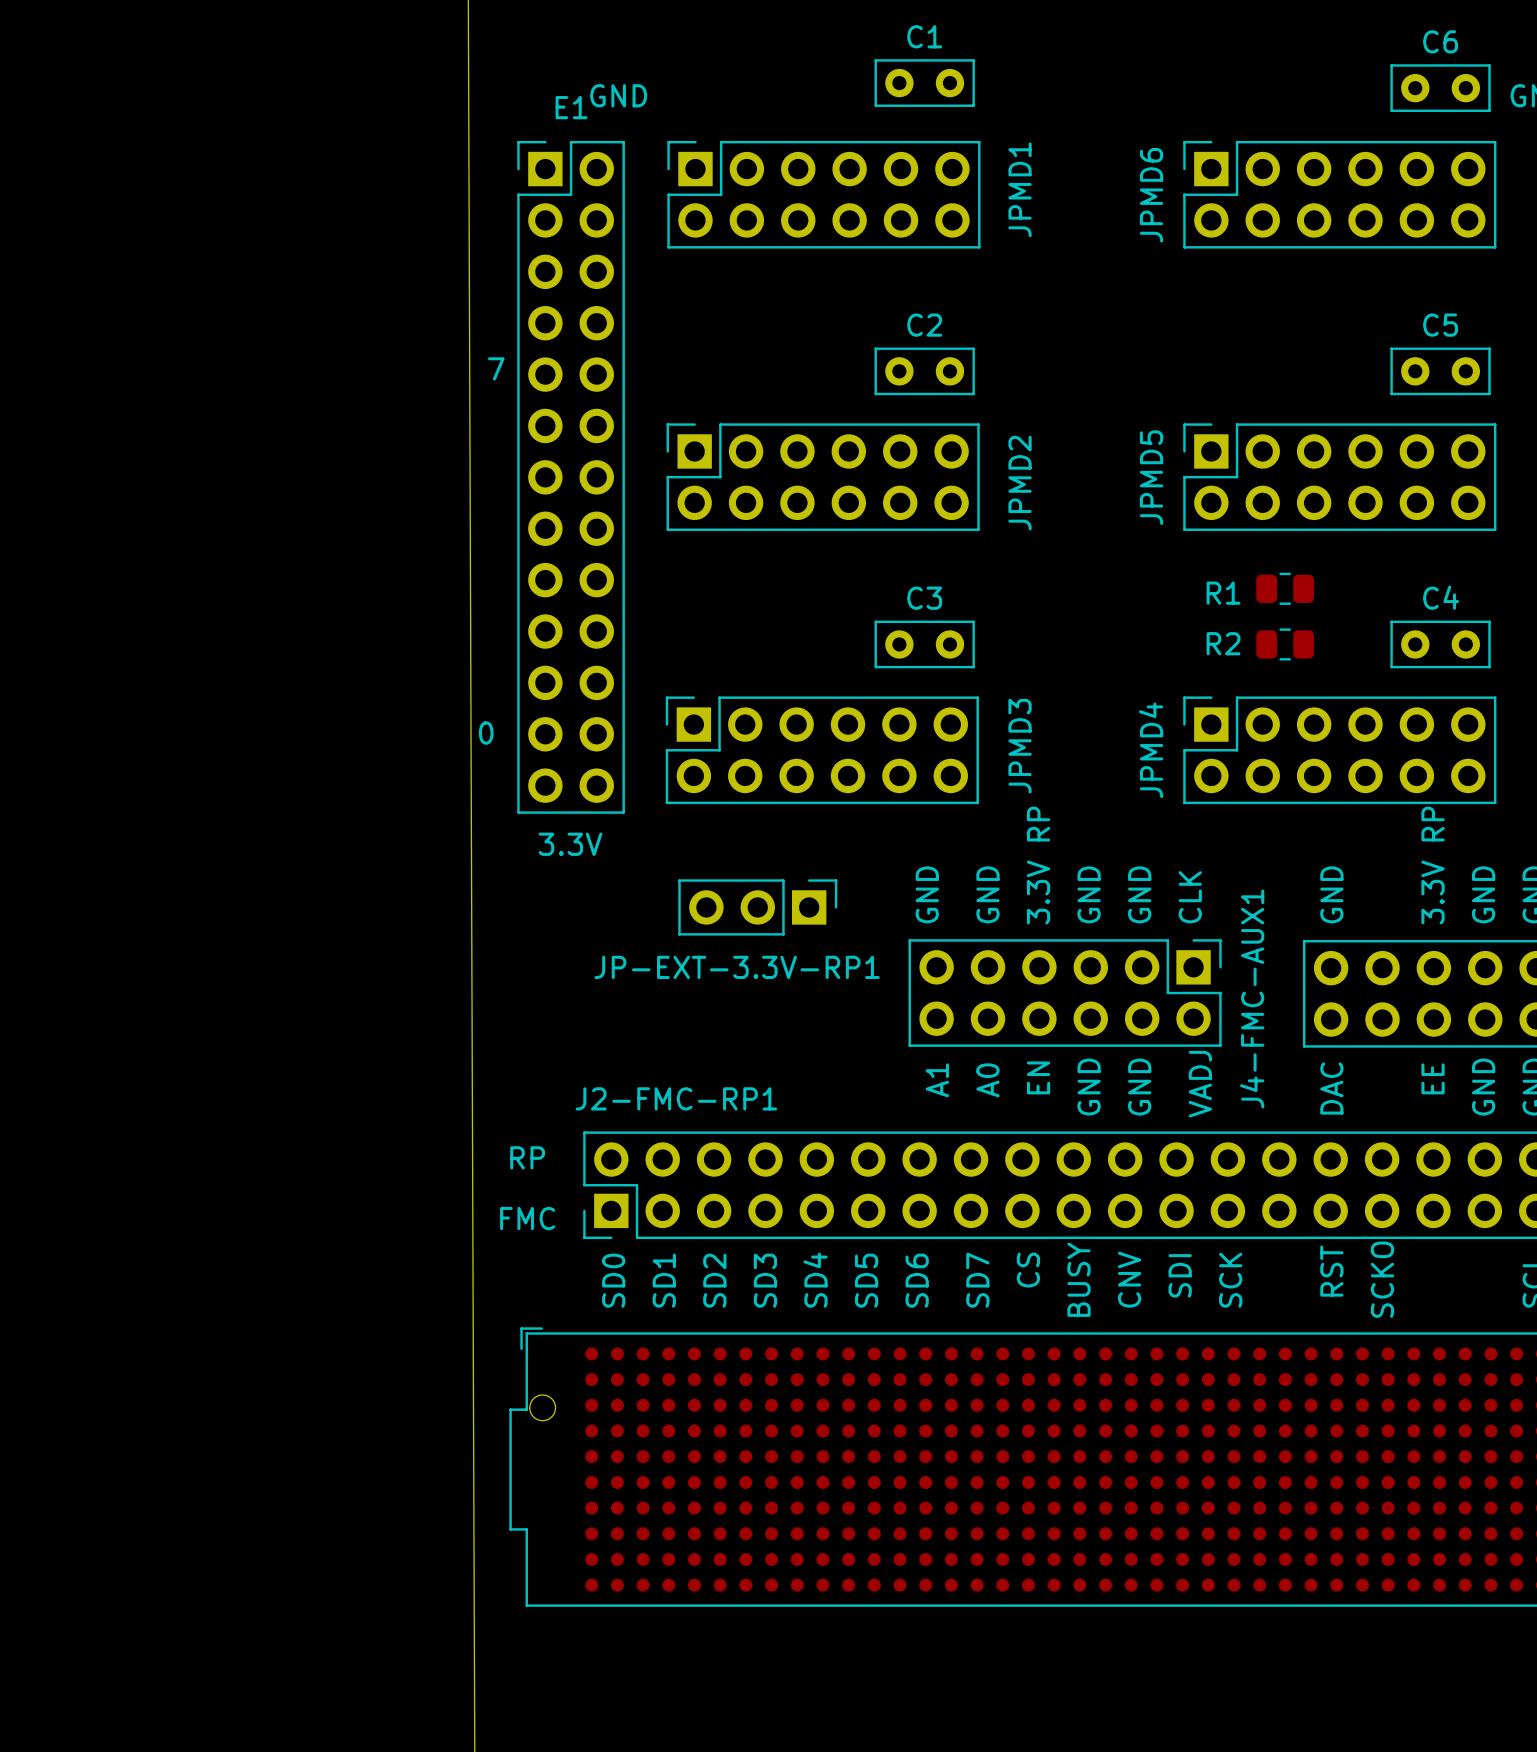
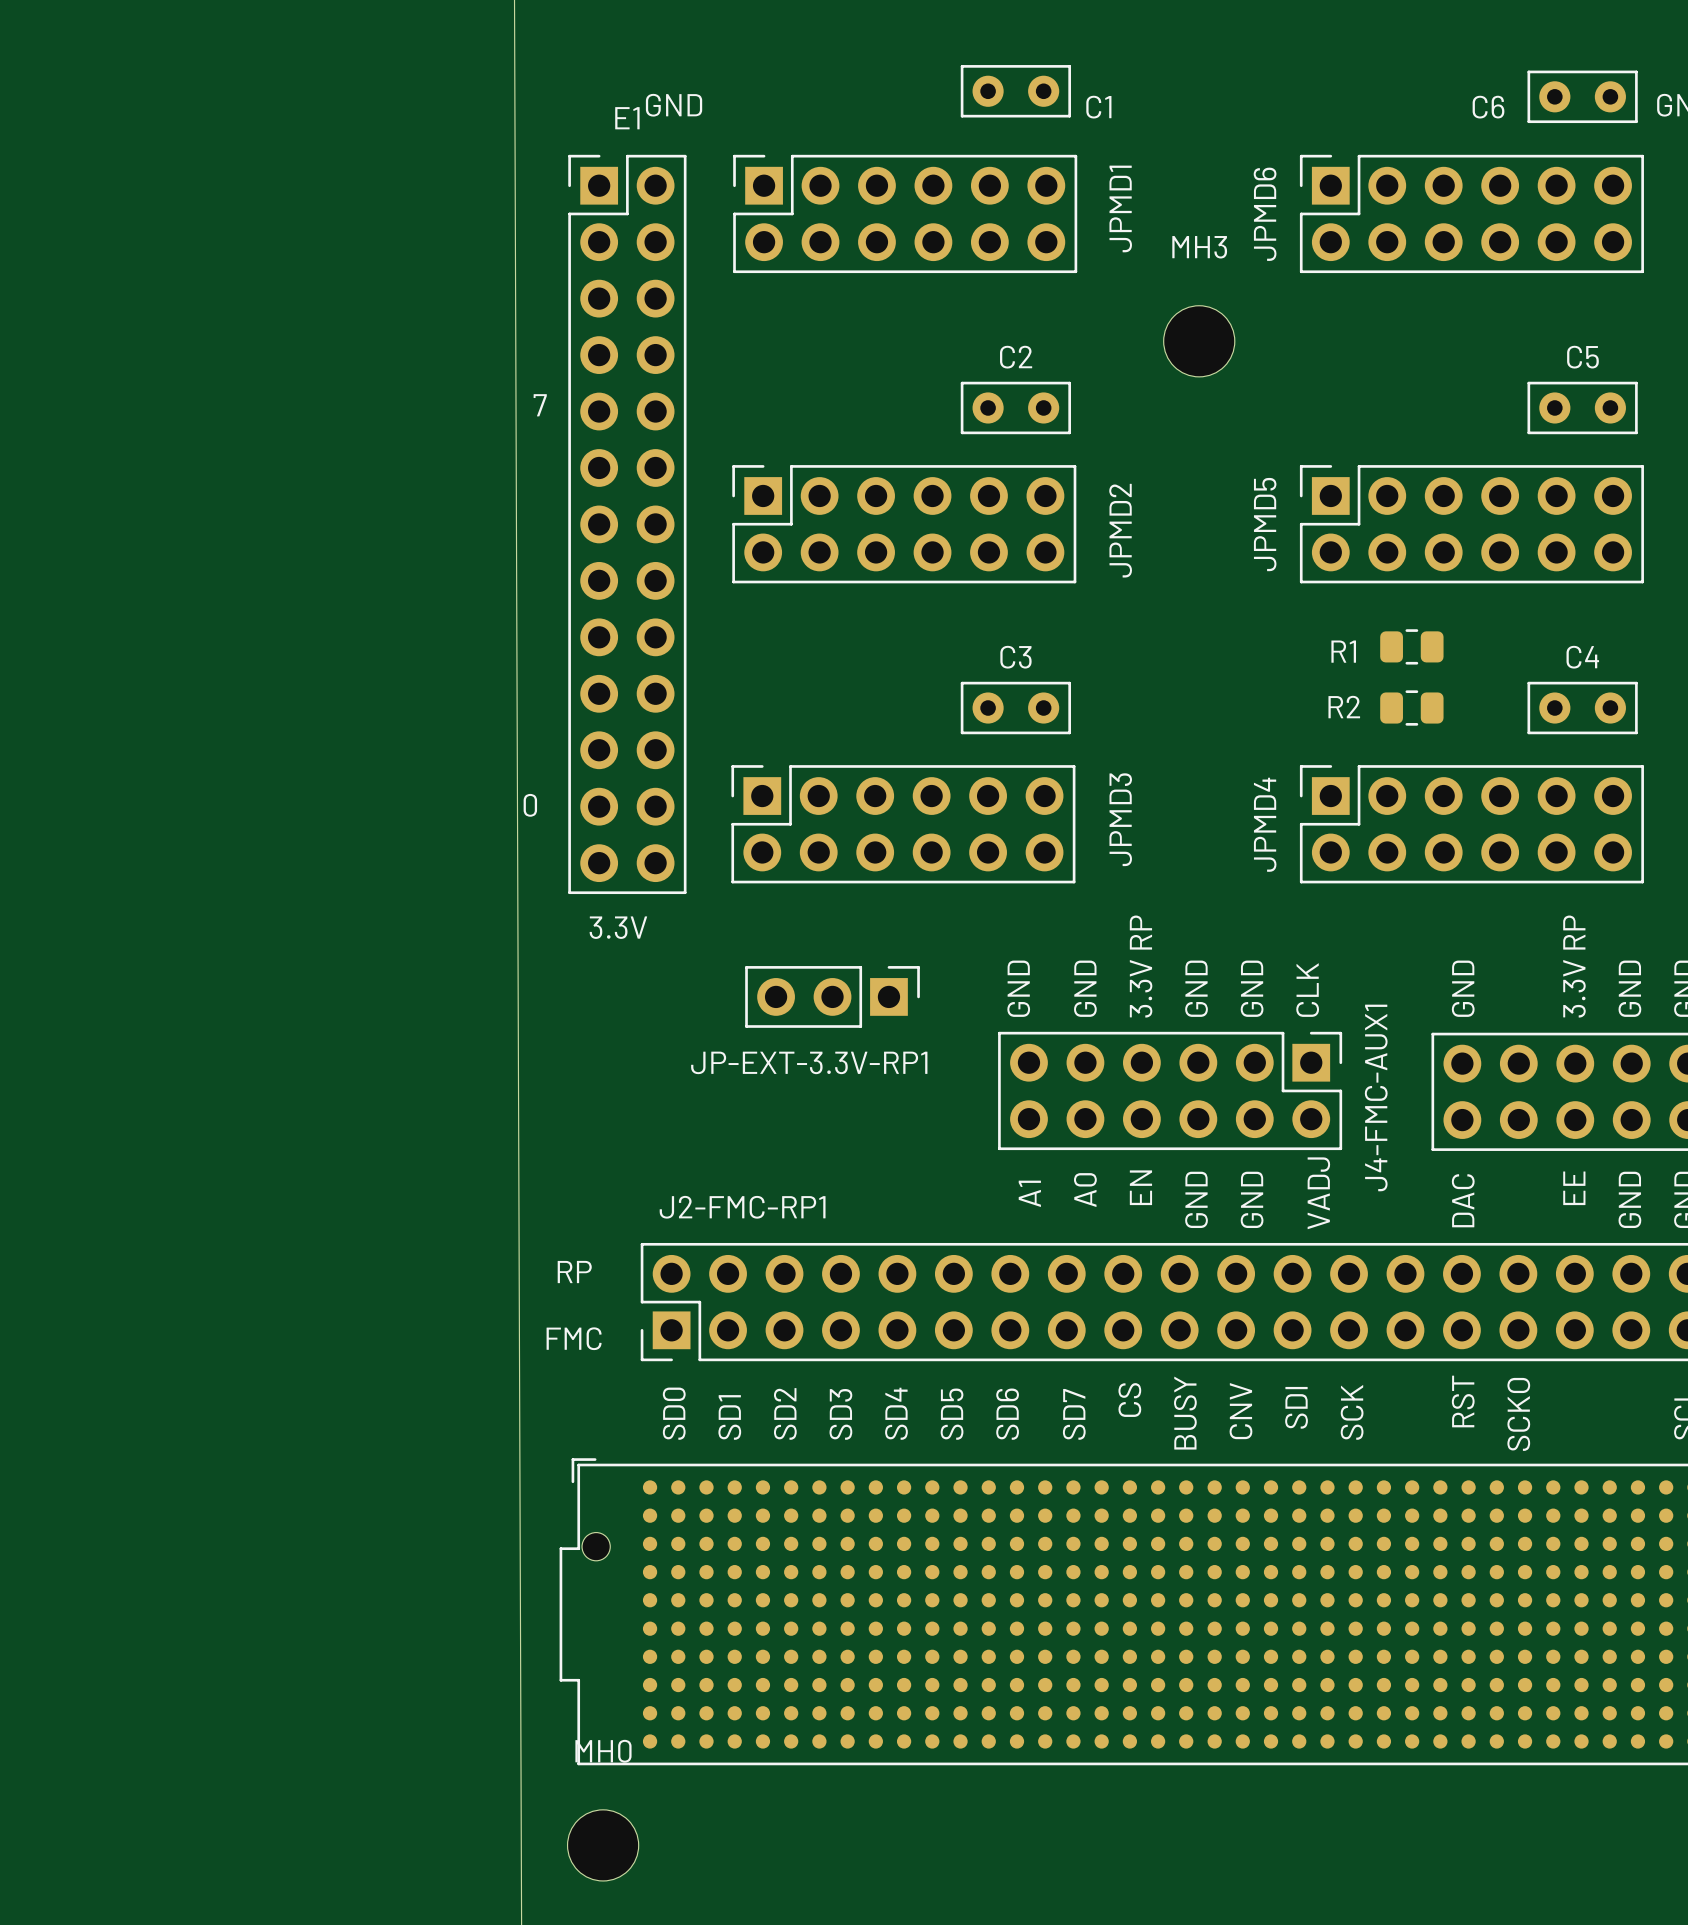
C1 name position: C1 (924, 36) -> C1 (1098, 107)
C6 name position: C6 (1440, 41) -> C6 (1488, 107)
MH3: none -> (1199, 341)
MH0: none -> (603, 1845)

